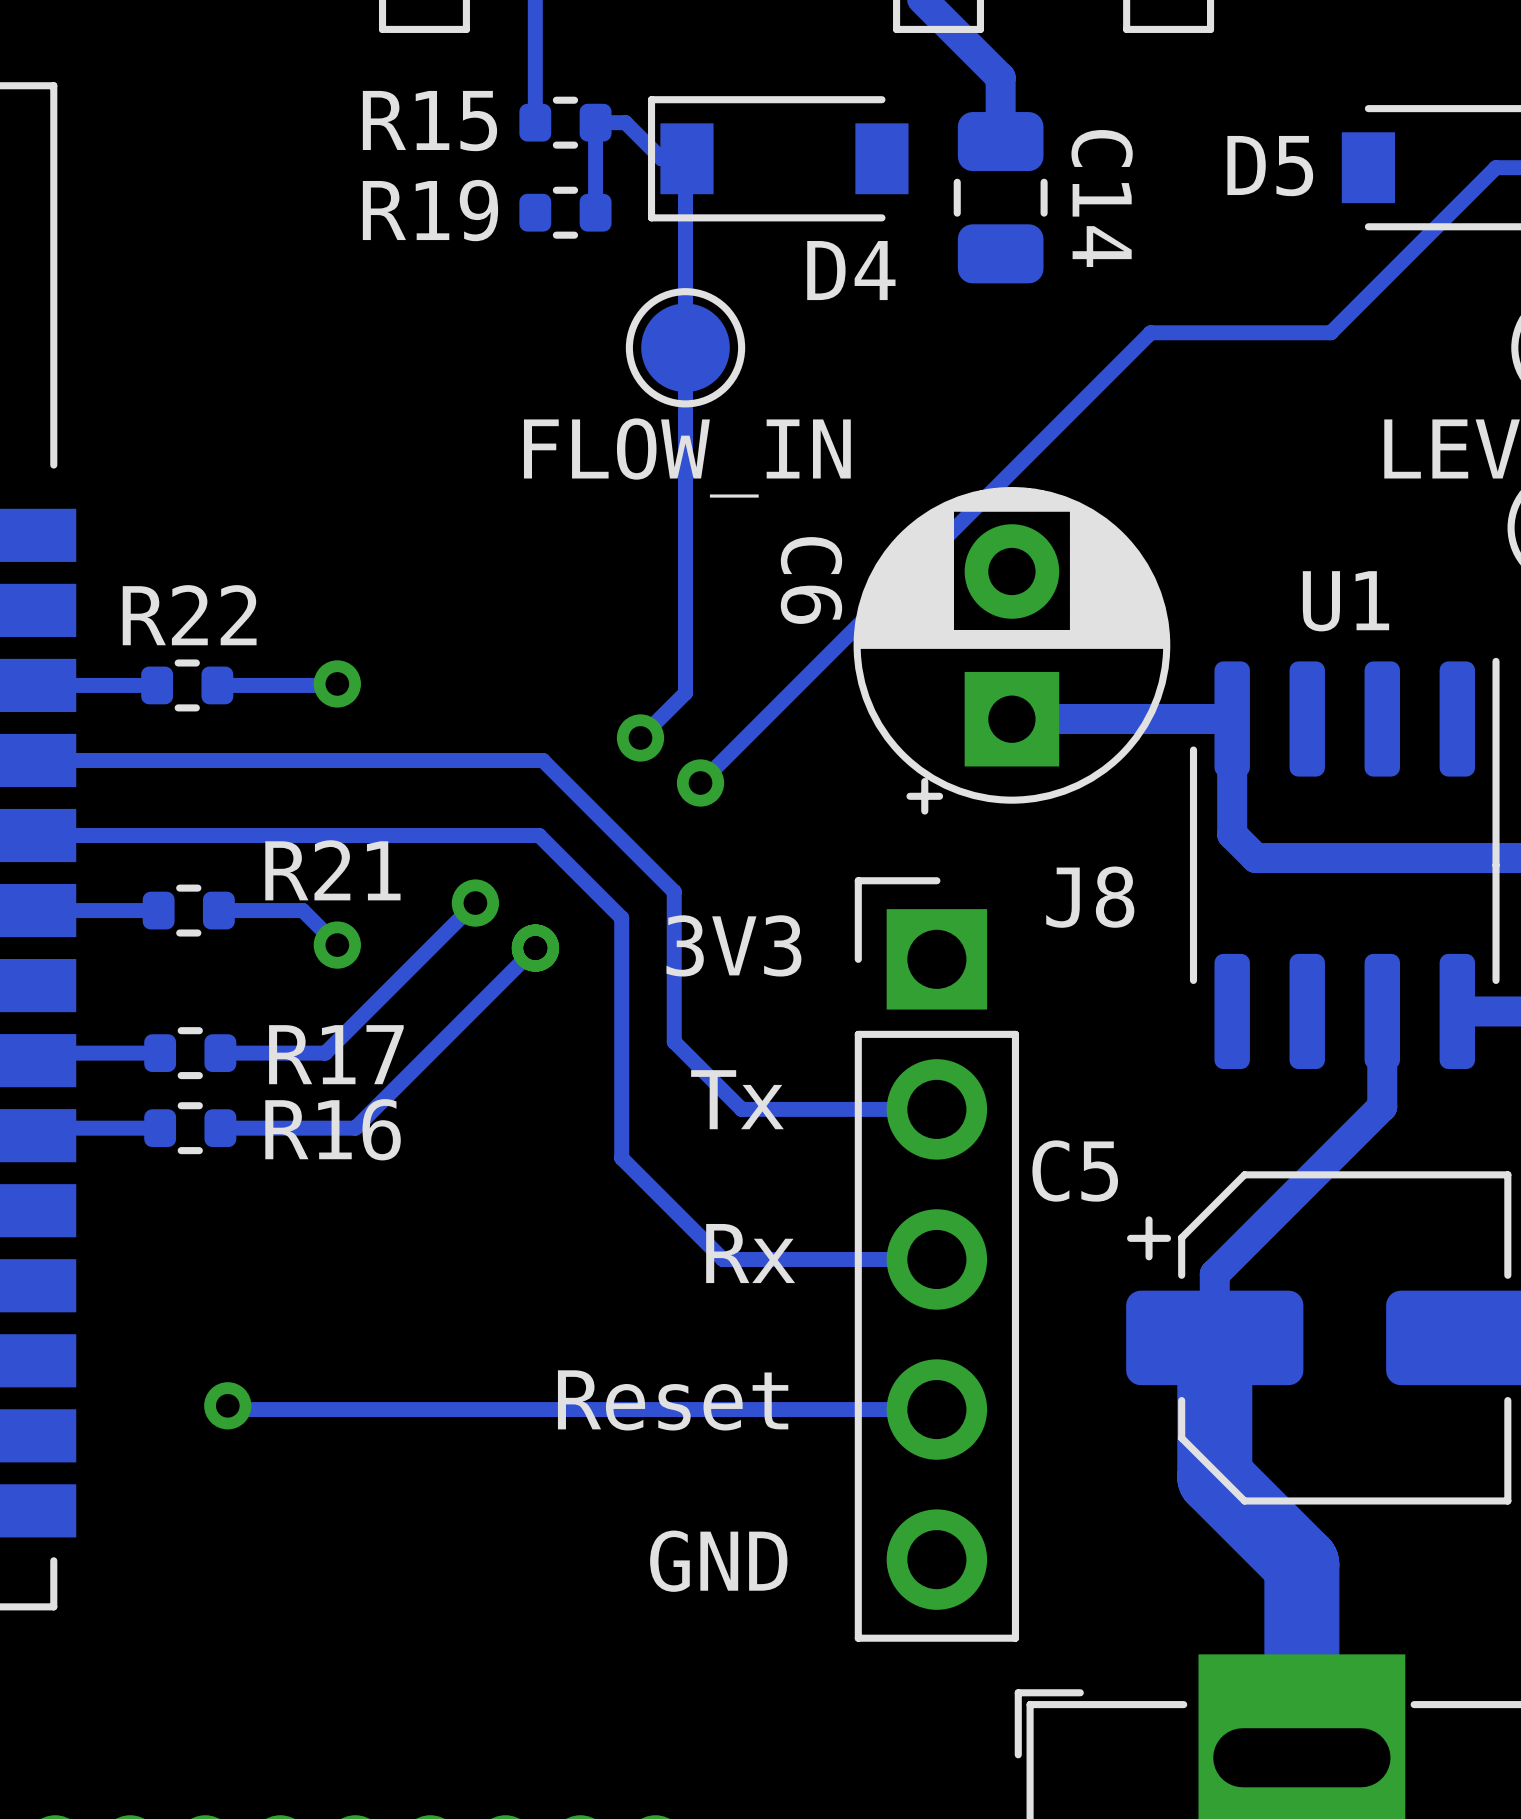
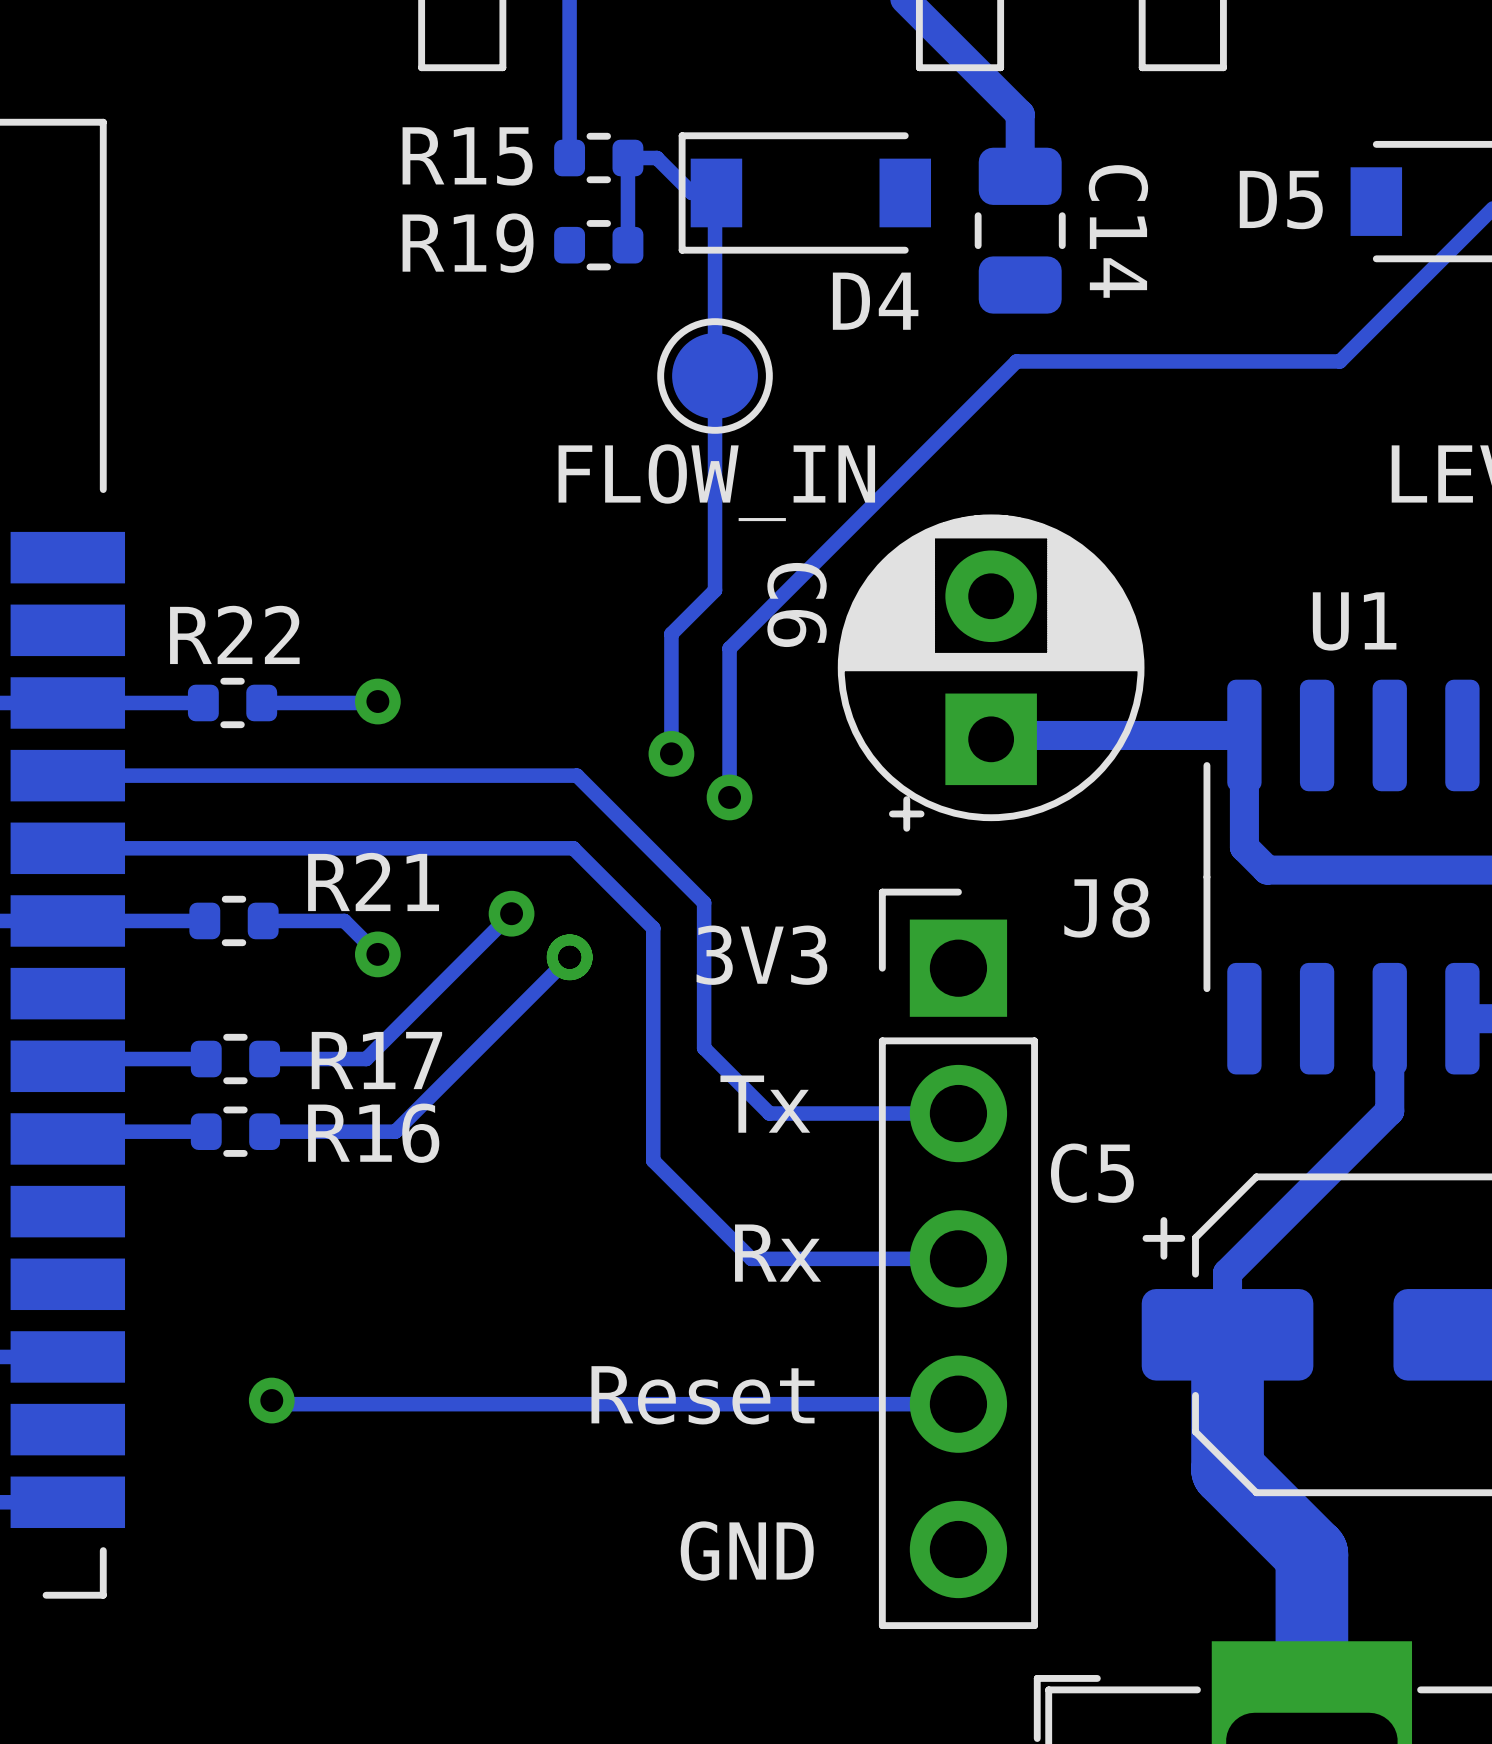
track: (1150, 332) (700, 782) -> (1165, 361) (1016, 361) (729, 648) (729, 797)
track: (685, 569) (685, 692) (640, 737) -> (715, 590) (671, 633) (671, 753)
C6 position: (1011, 650) -> (991, 673)

